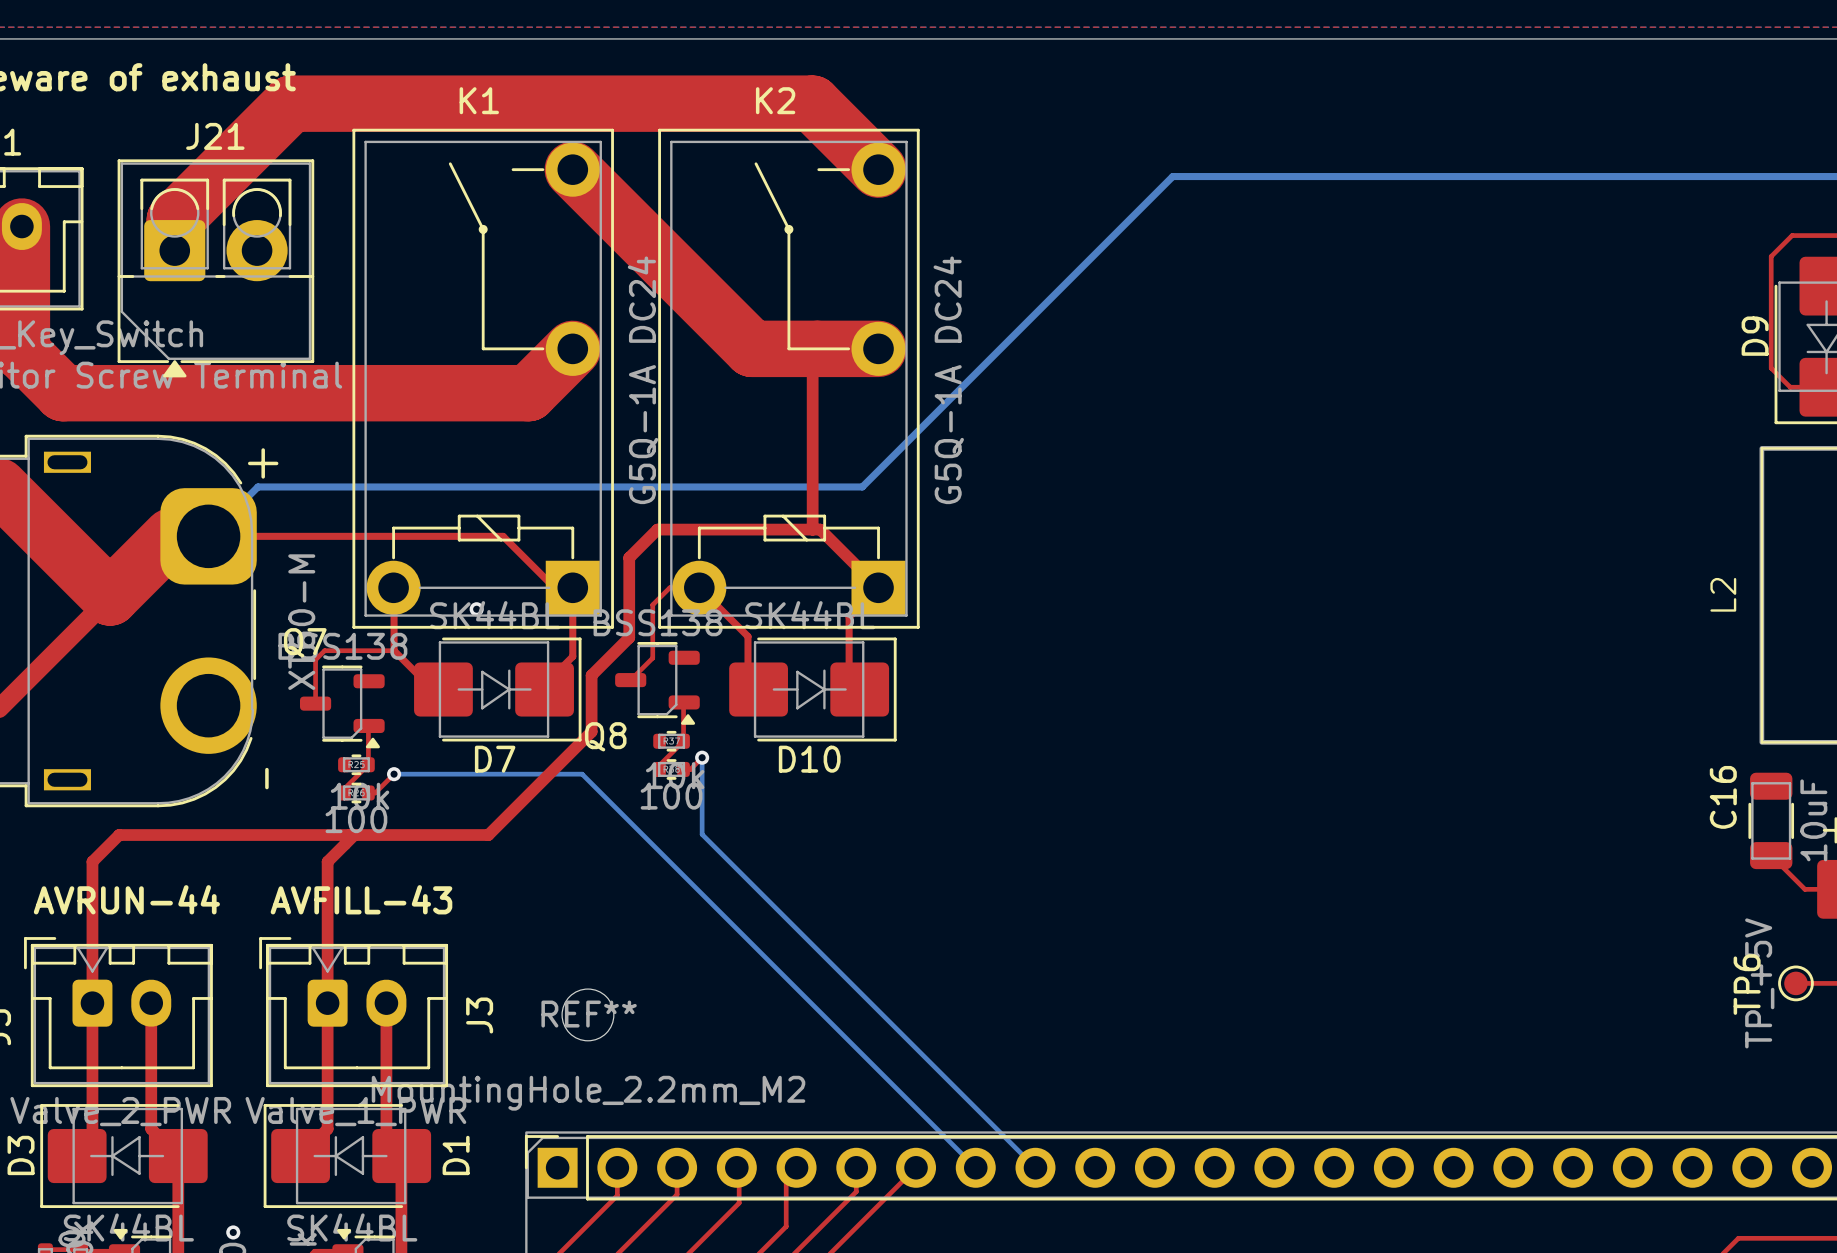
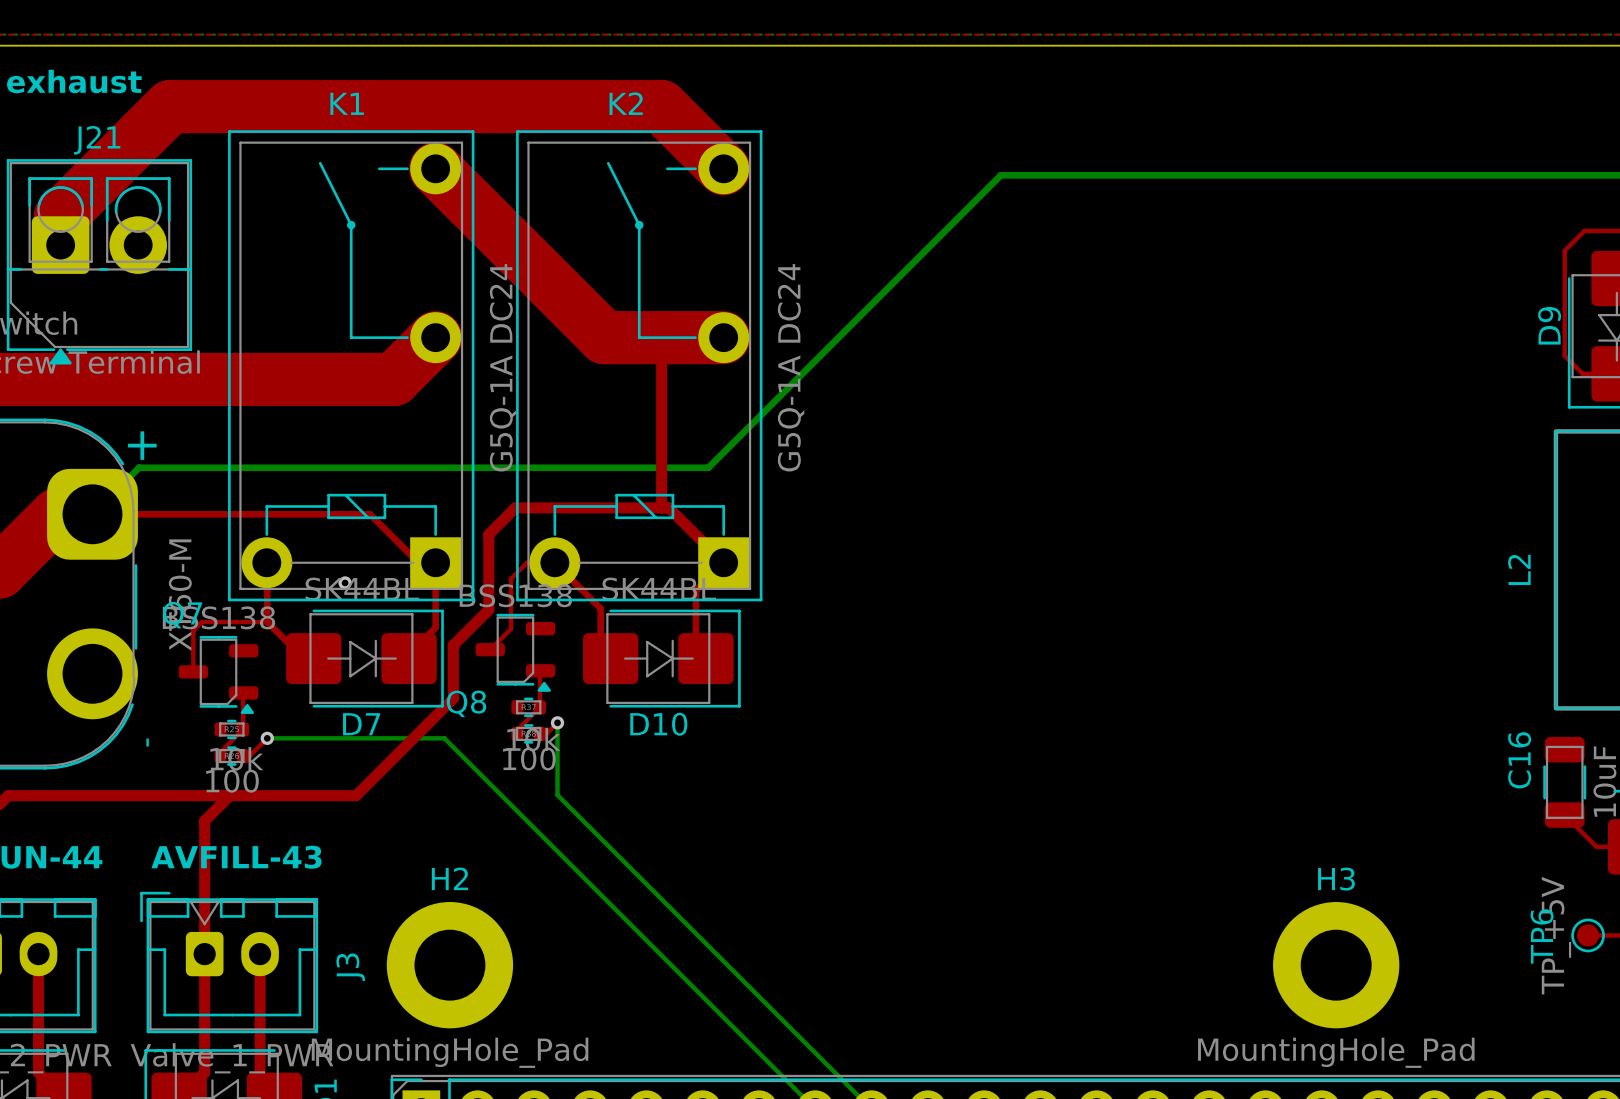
REF**: MountingHole_2.2mm_M2 (587, 1014) -> none
H2: none -> MountingHole_Pad (449, 965)
H3: none -> MountingHole_Pad (1336, 965)

